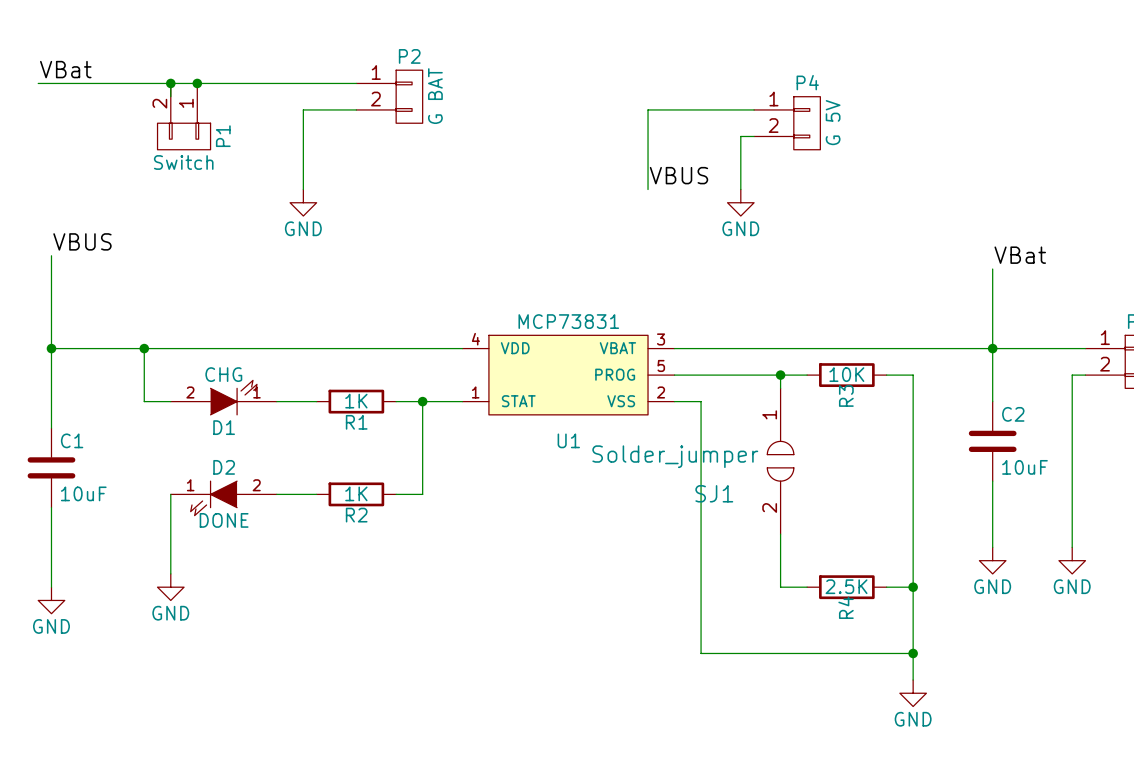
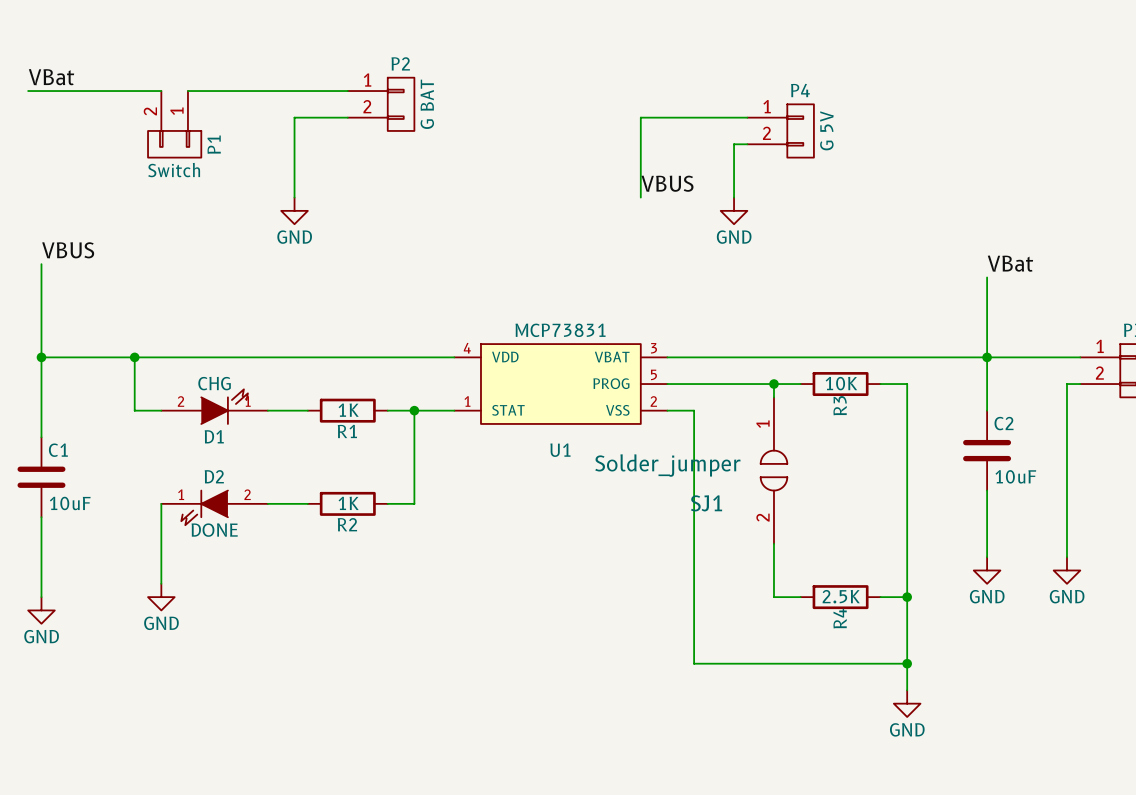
junction: (170, 83) -> none
wire: (197, 83) (170, 83) (170, 96) -> none
junction: (197, 83) -> none

